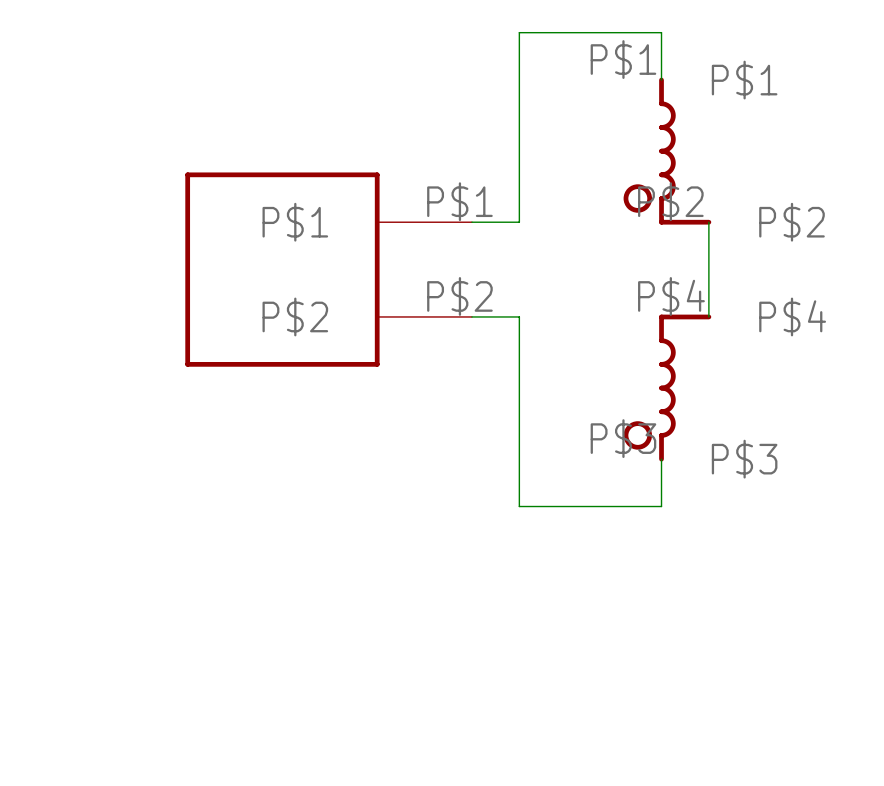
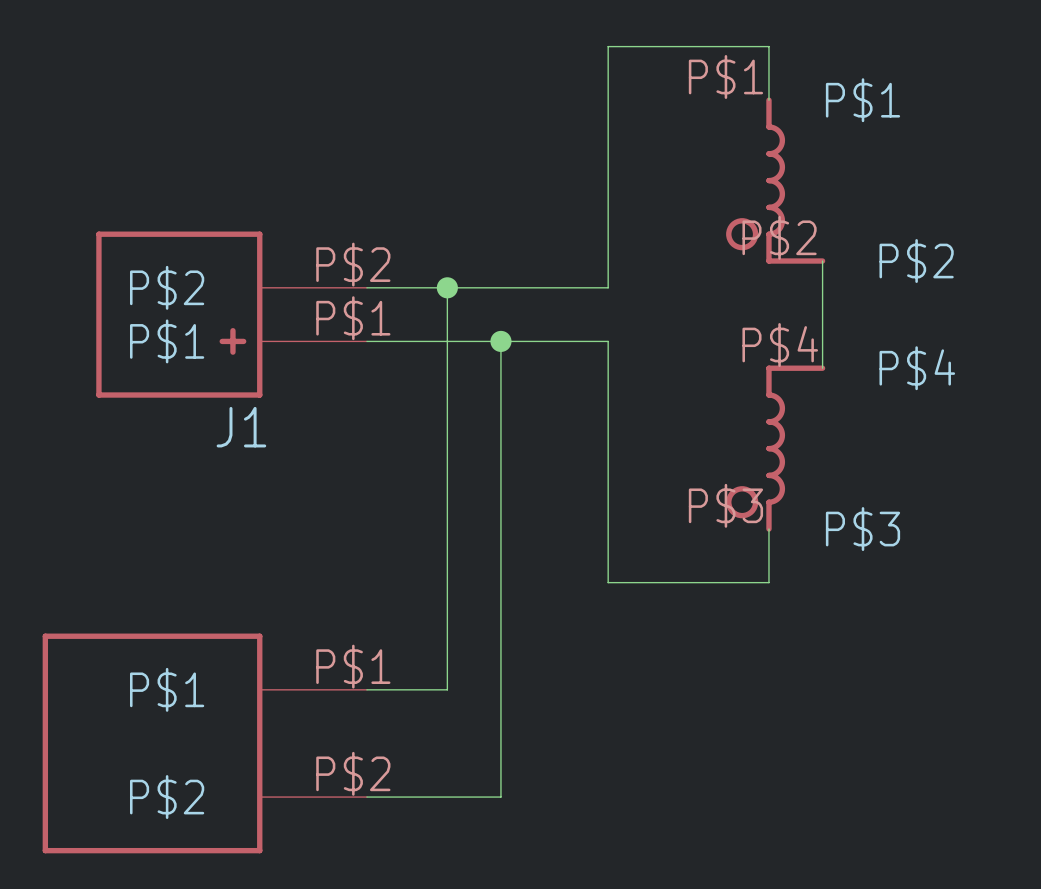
wire: (471, 222) (519, 222) -> (366, 287) (608, 287) (608, 261)
wire: none -> (447, 287) (447, 689) (366, 689)
junction: none -> (447, 287)
J1: none -> (231, 314)
part position: (328, 269) -> (204, 743)
wire: none -> (500, 341) (500, 797) (366, 797)
junction: none -> (500, 341)
wire: (471, 316) (519, 316) -> (366, 341) (608, 341) (608, 368)

